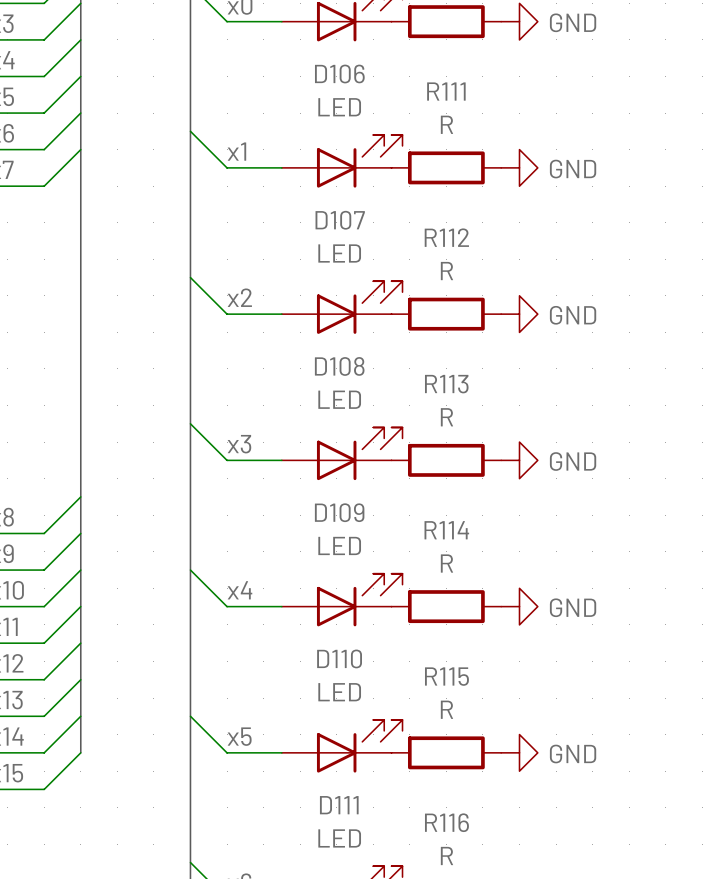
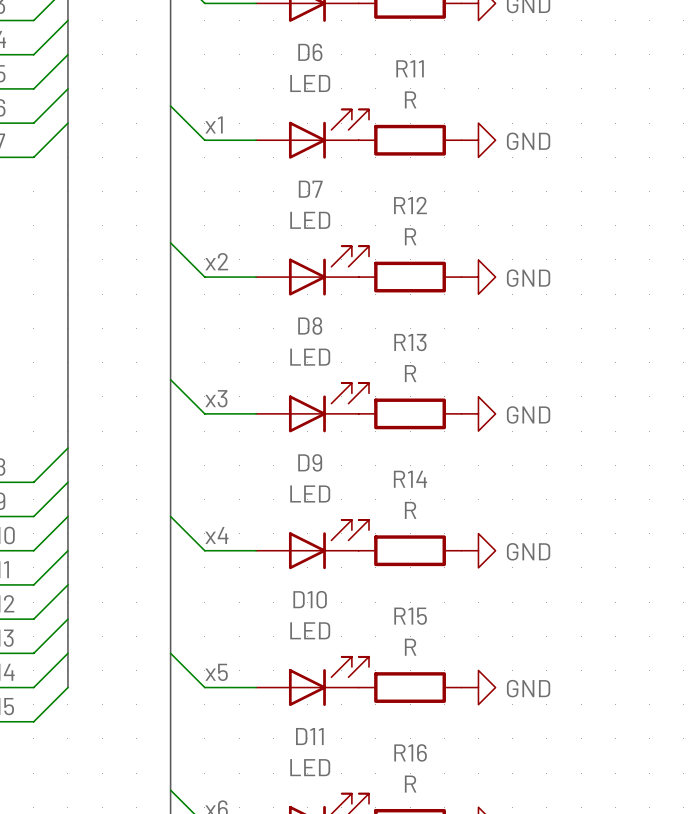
D106 name: D106 (339, 74) -> D6 (310, 52)
R111 name: R111 (446, 91) -> R11 (410, 68)
D107 name: D107 (340, 220) -> D7 (310, 189)
R112 name: R112 (446, 237) -> R12 (410, 205)
D108 name: D108 (339, 366) -> D8 (310, 326)
R113 name: R113 (446, 384) -> R13 (410, 342)
D109 name: D109 (339, 512) -> D9 (310, 462)
R114 name: R114 (446, 530) -> R14 (410, 479)
D110 name: D110 (339, 658) -> D10 (310, 599)
R115 name: R115 (446, 676) -> R15 (410, 616)
D111 name: D111 (339, 805) -> D11 (309, 736)
R116 name: R116 (446, 822) -> R16 (410, 752)

